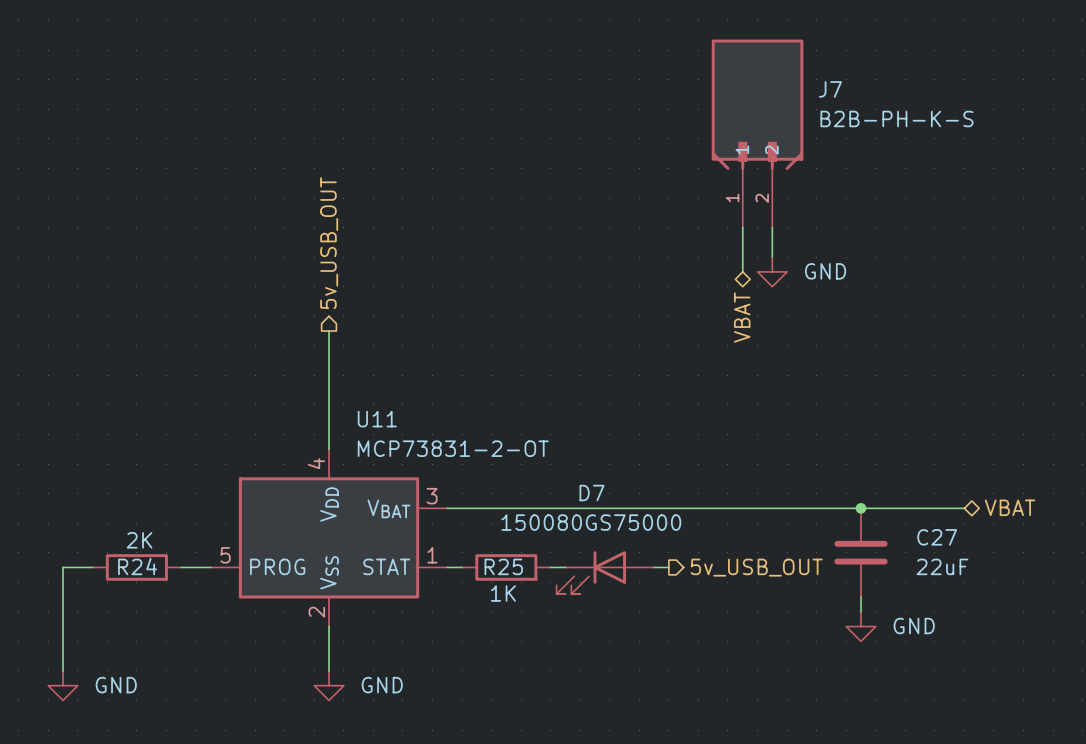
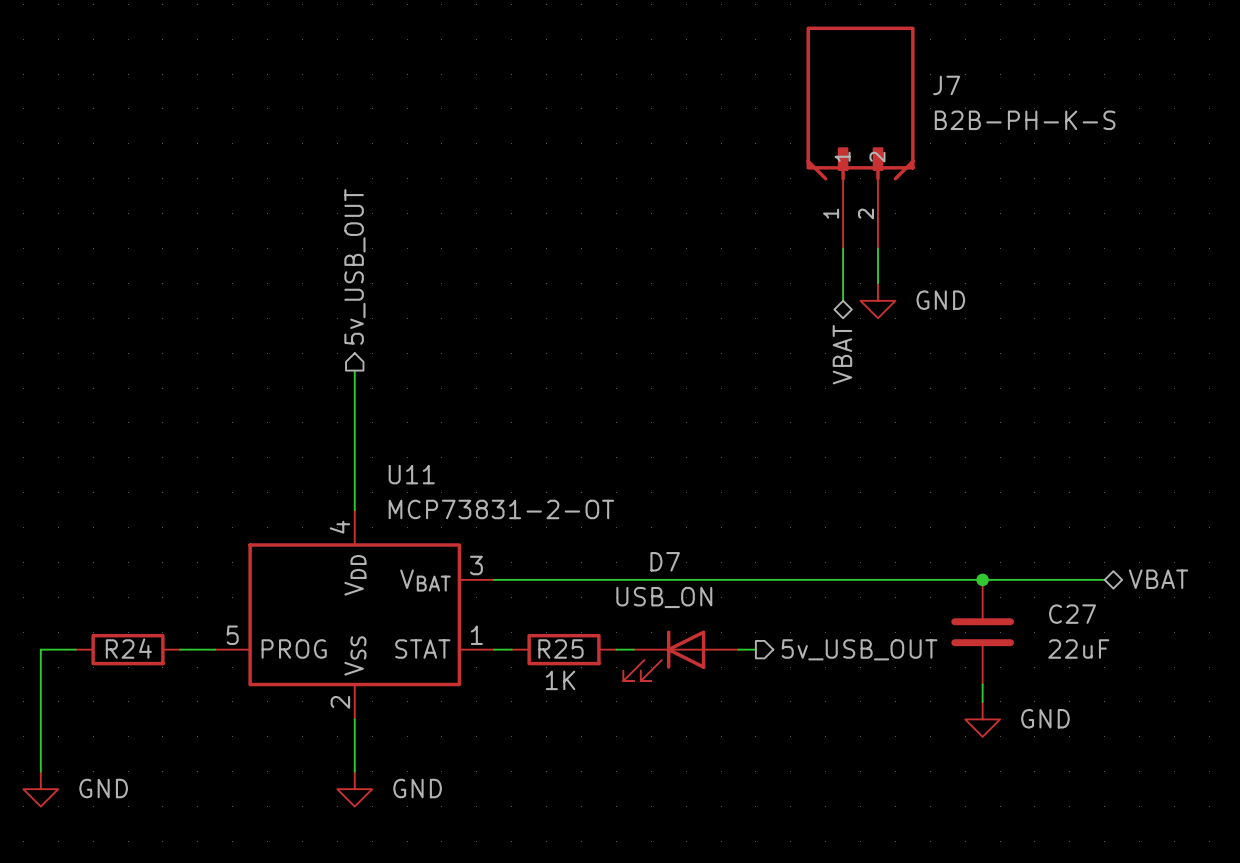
D7 value: 150080GS75000 (591, 522) -> USB_ON (664, 597)
R24 value: 2K (139, 540) -> none

